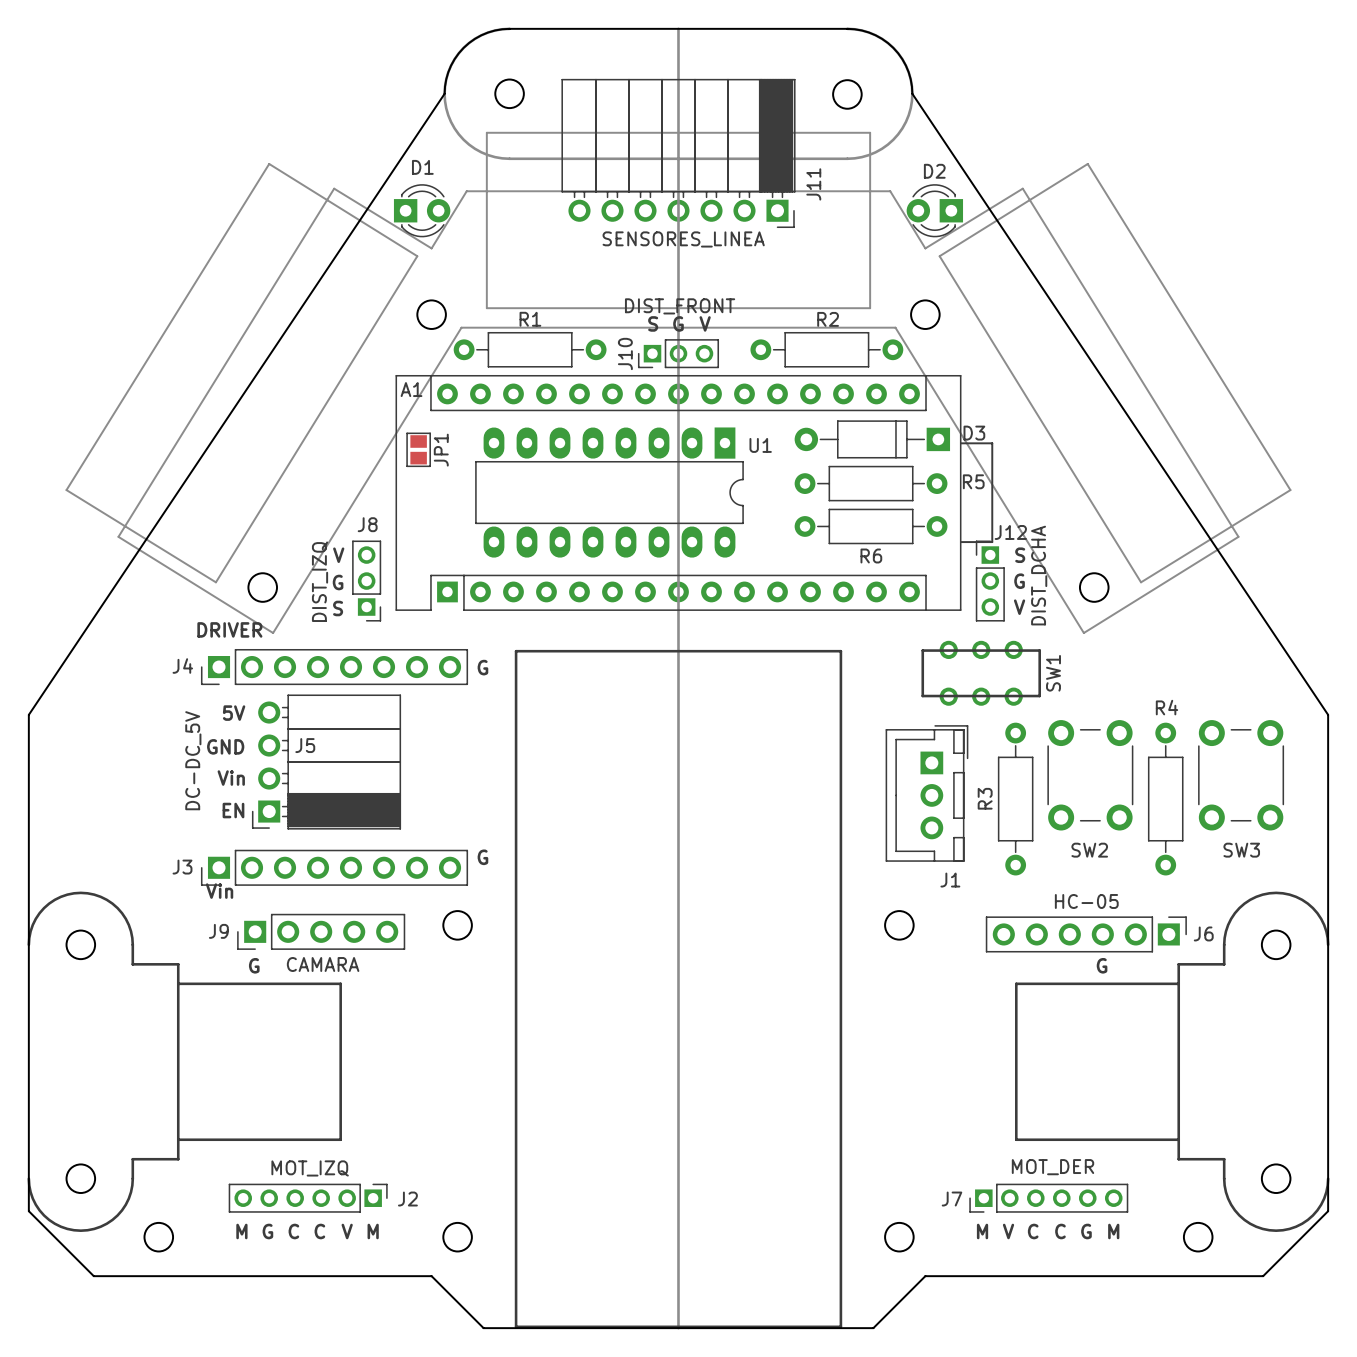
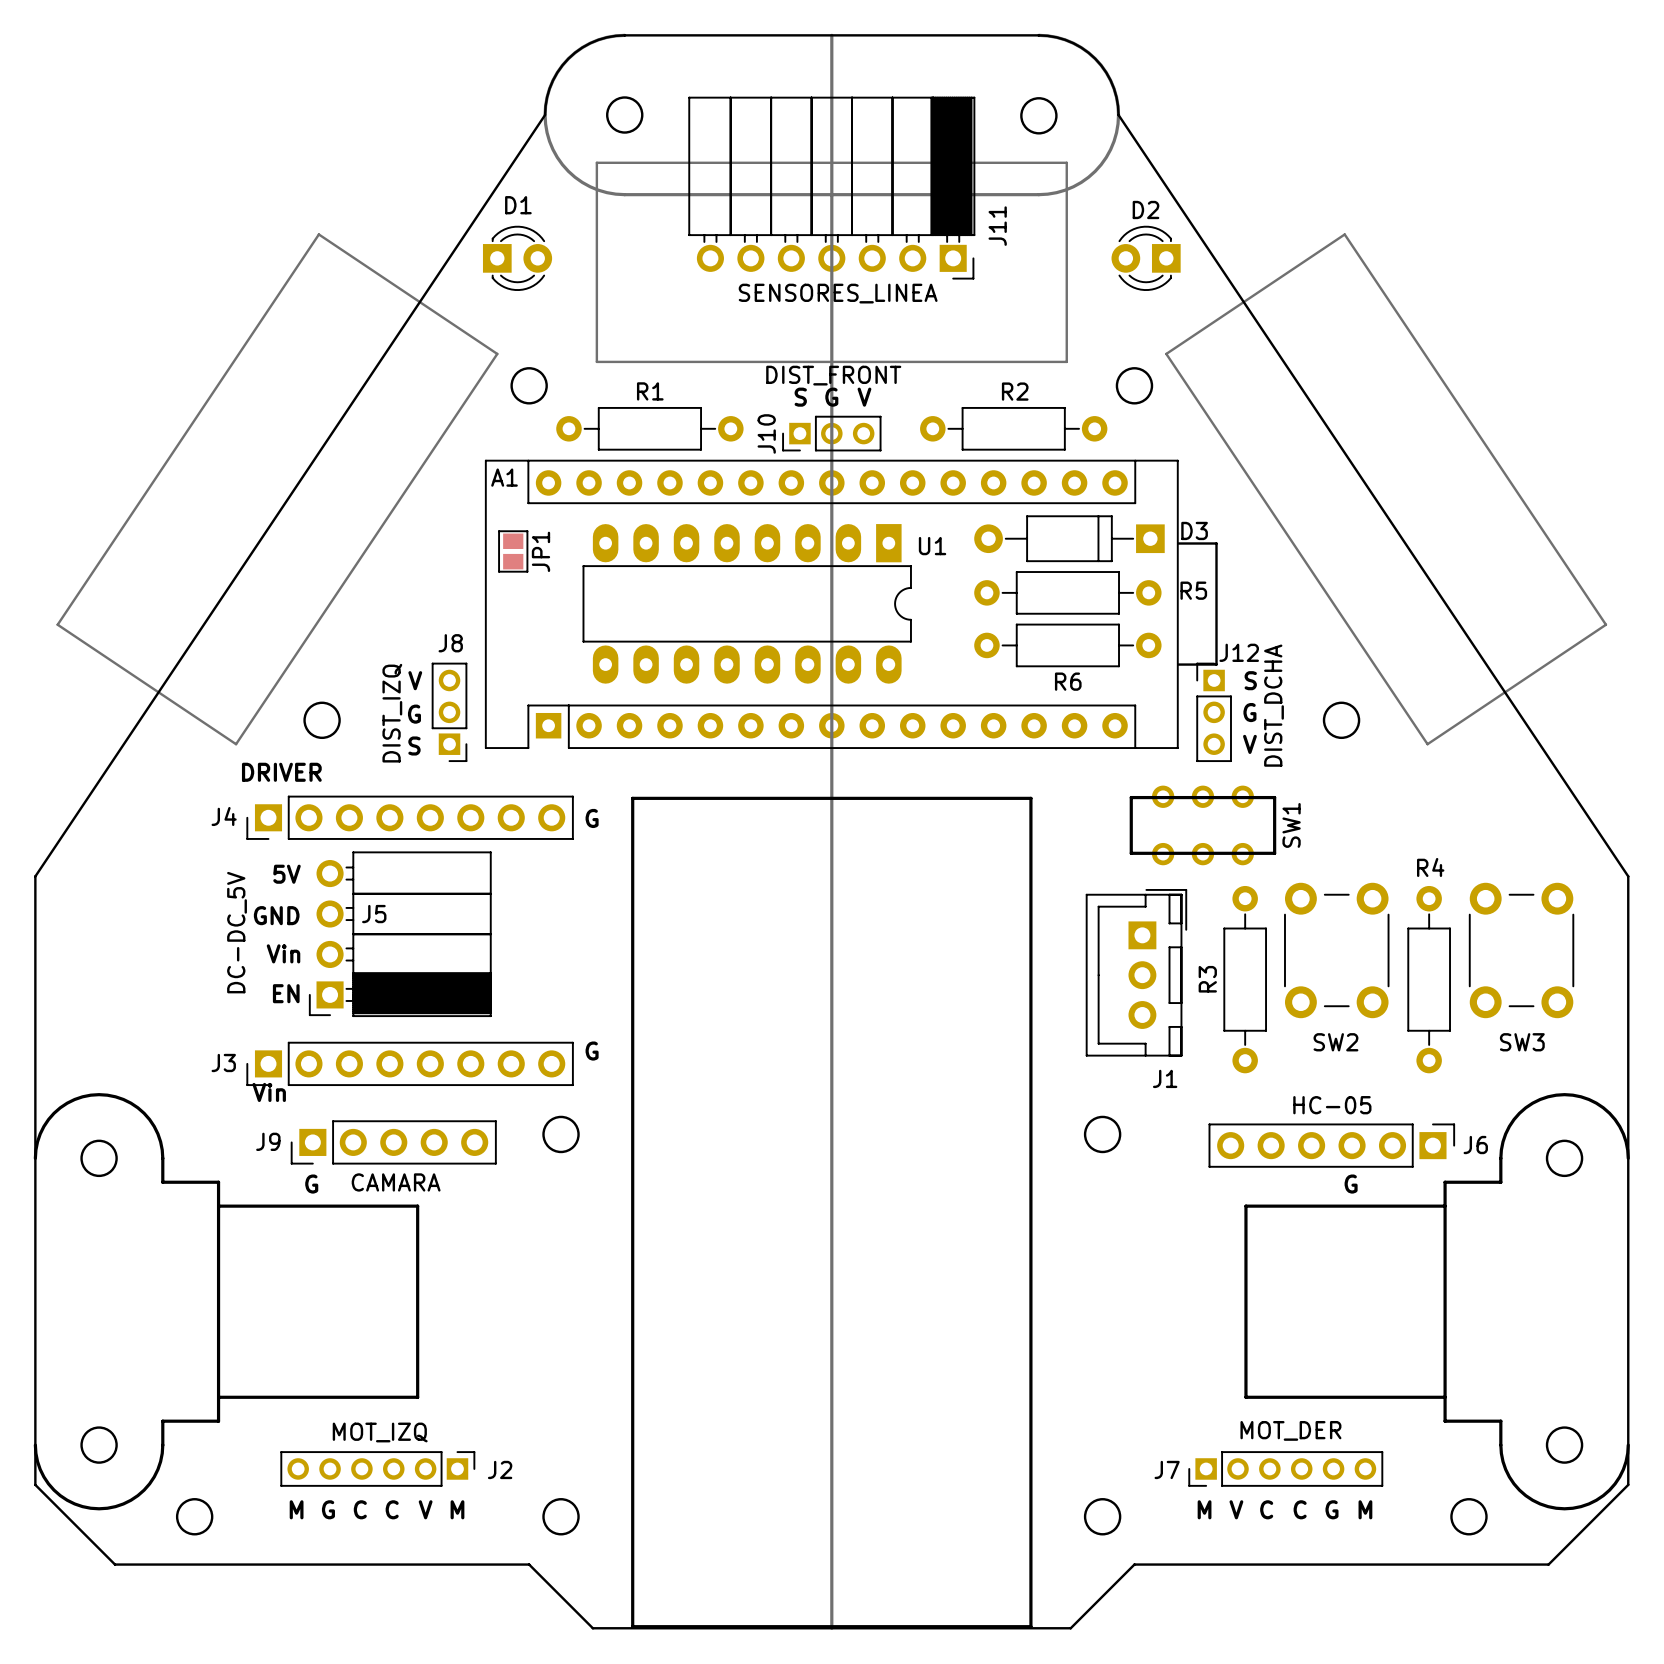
line: (269, 163) (66, 490) (215, 582) (417, 256) (269, 163) -> (318, 234) (57, 624) (236, 744) (497, 353) (318, 234)
line: (1087, 163) (1290, 490) (1141, 582) (939, 256) (1087, 163) -> (1344, 234) (1166, 353) (1427, 744) (1605, 624) (1344, 234)
line: (334, 188) (118, 536) (273, 633) (461, 327) (895, 327) (1083, 633) (1238, 536) (1022, 188) (925, 248) (890, 191) (466, 191) (431, 248) (334, 188) -> none
line: (486, 295) (486, 308) (870, 308) (870, 295) -> (596, 361) (1066, 361)

